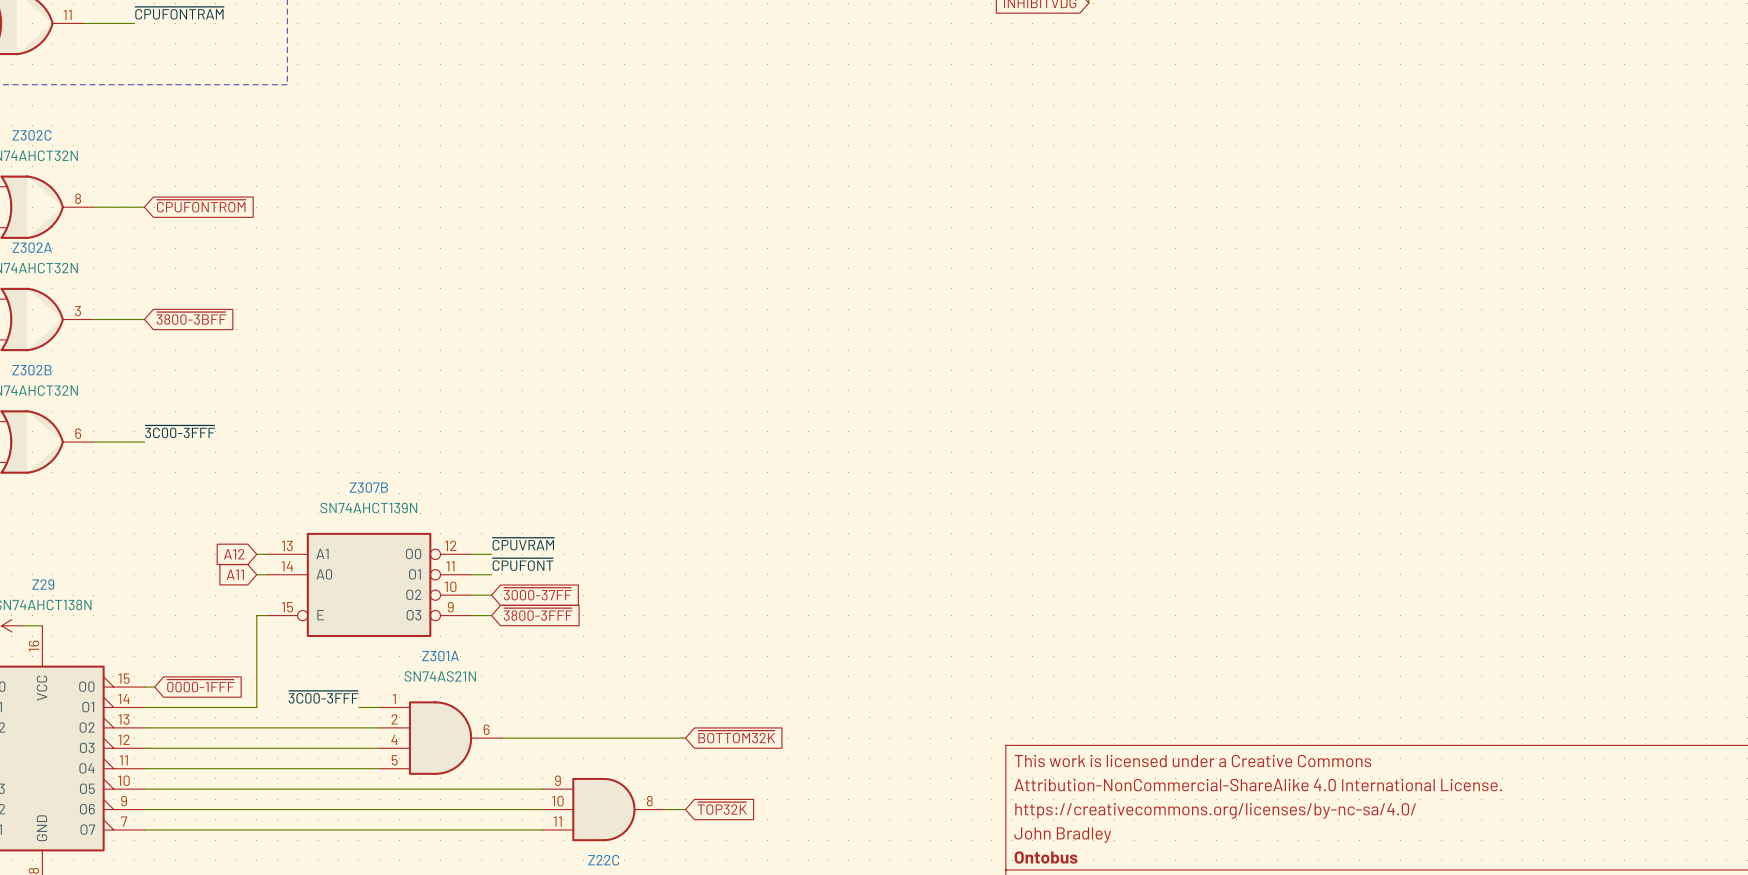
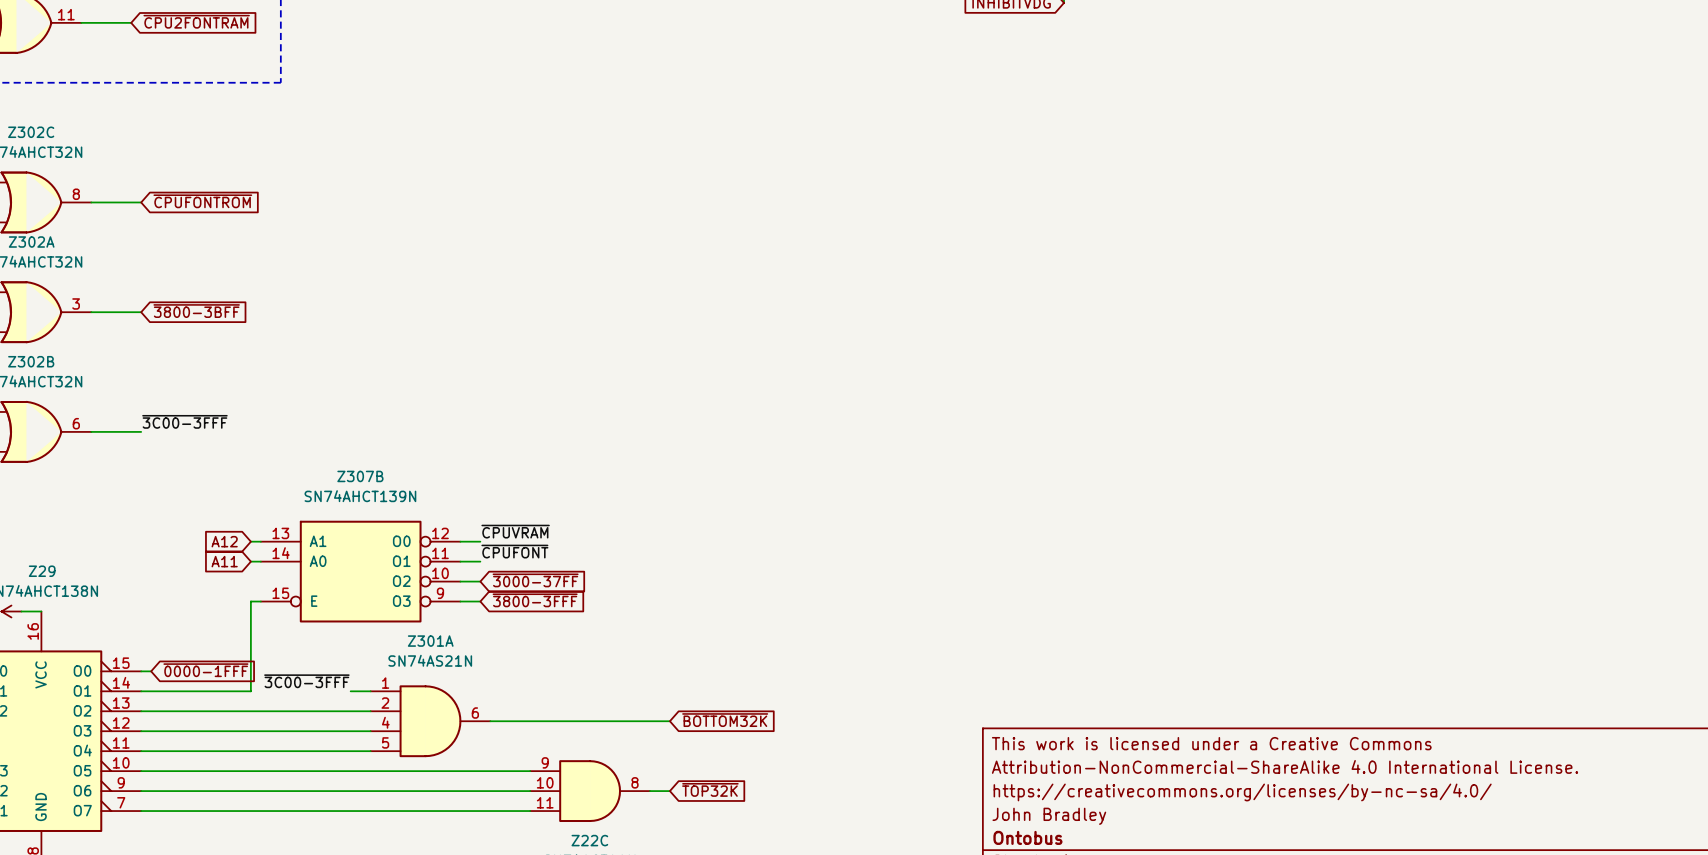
label: ~{CPUFONTRAM} (179, 13) -> none
global label: none -> ~{CPU2FONTRAM} (196, 21)

